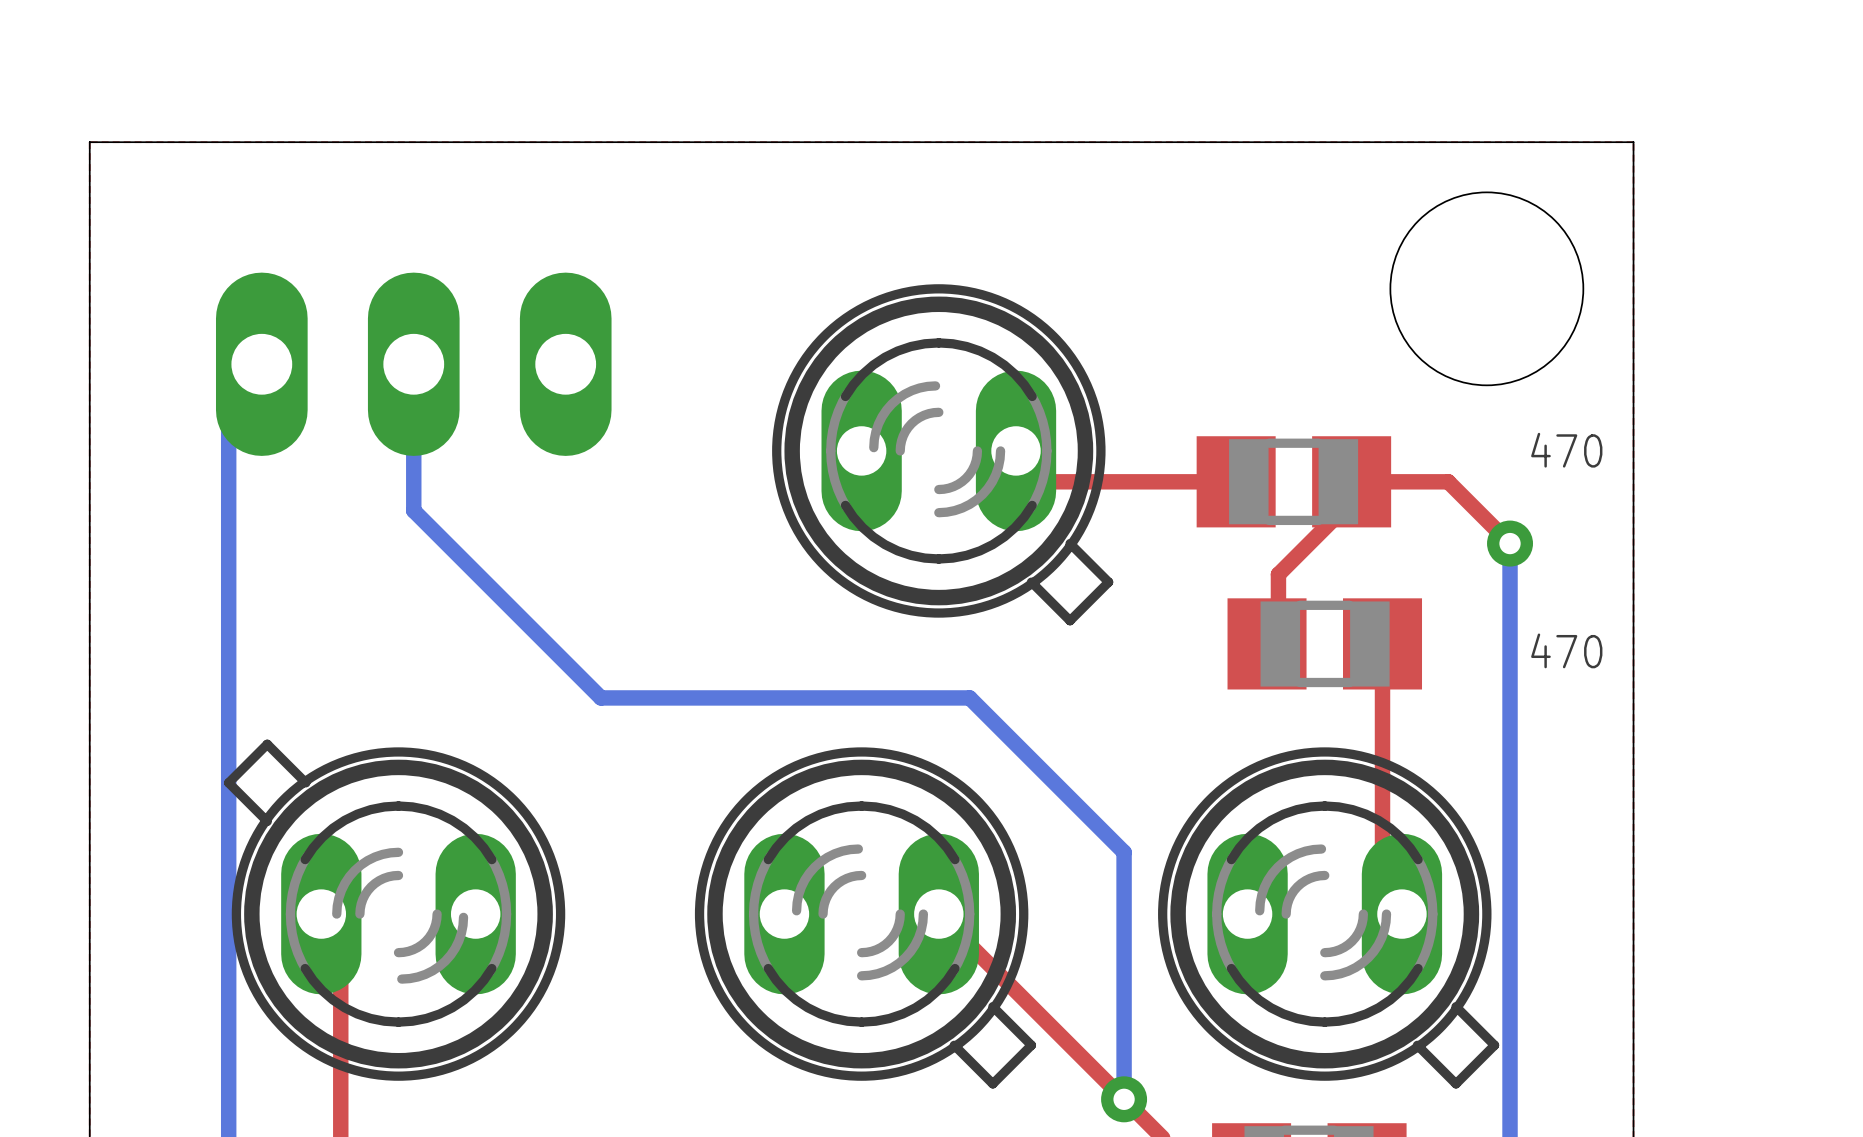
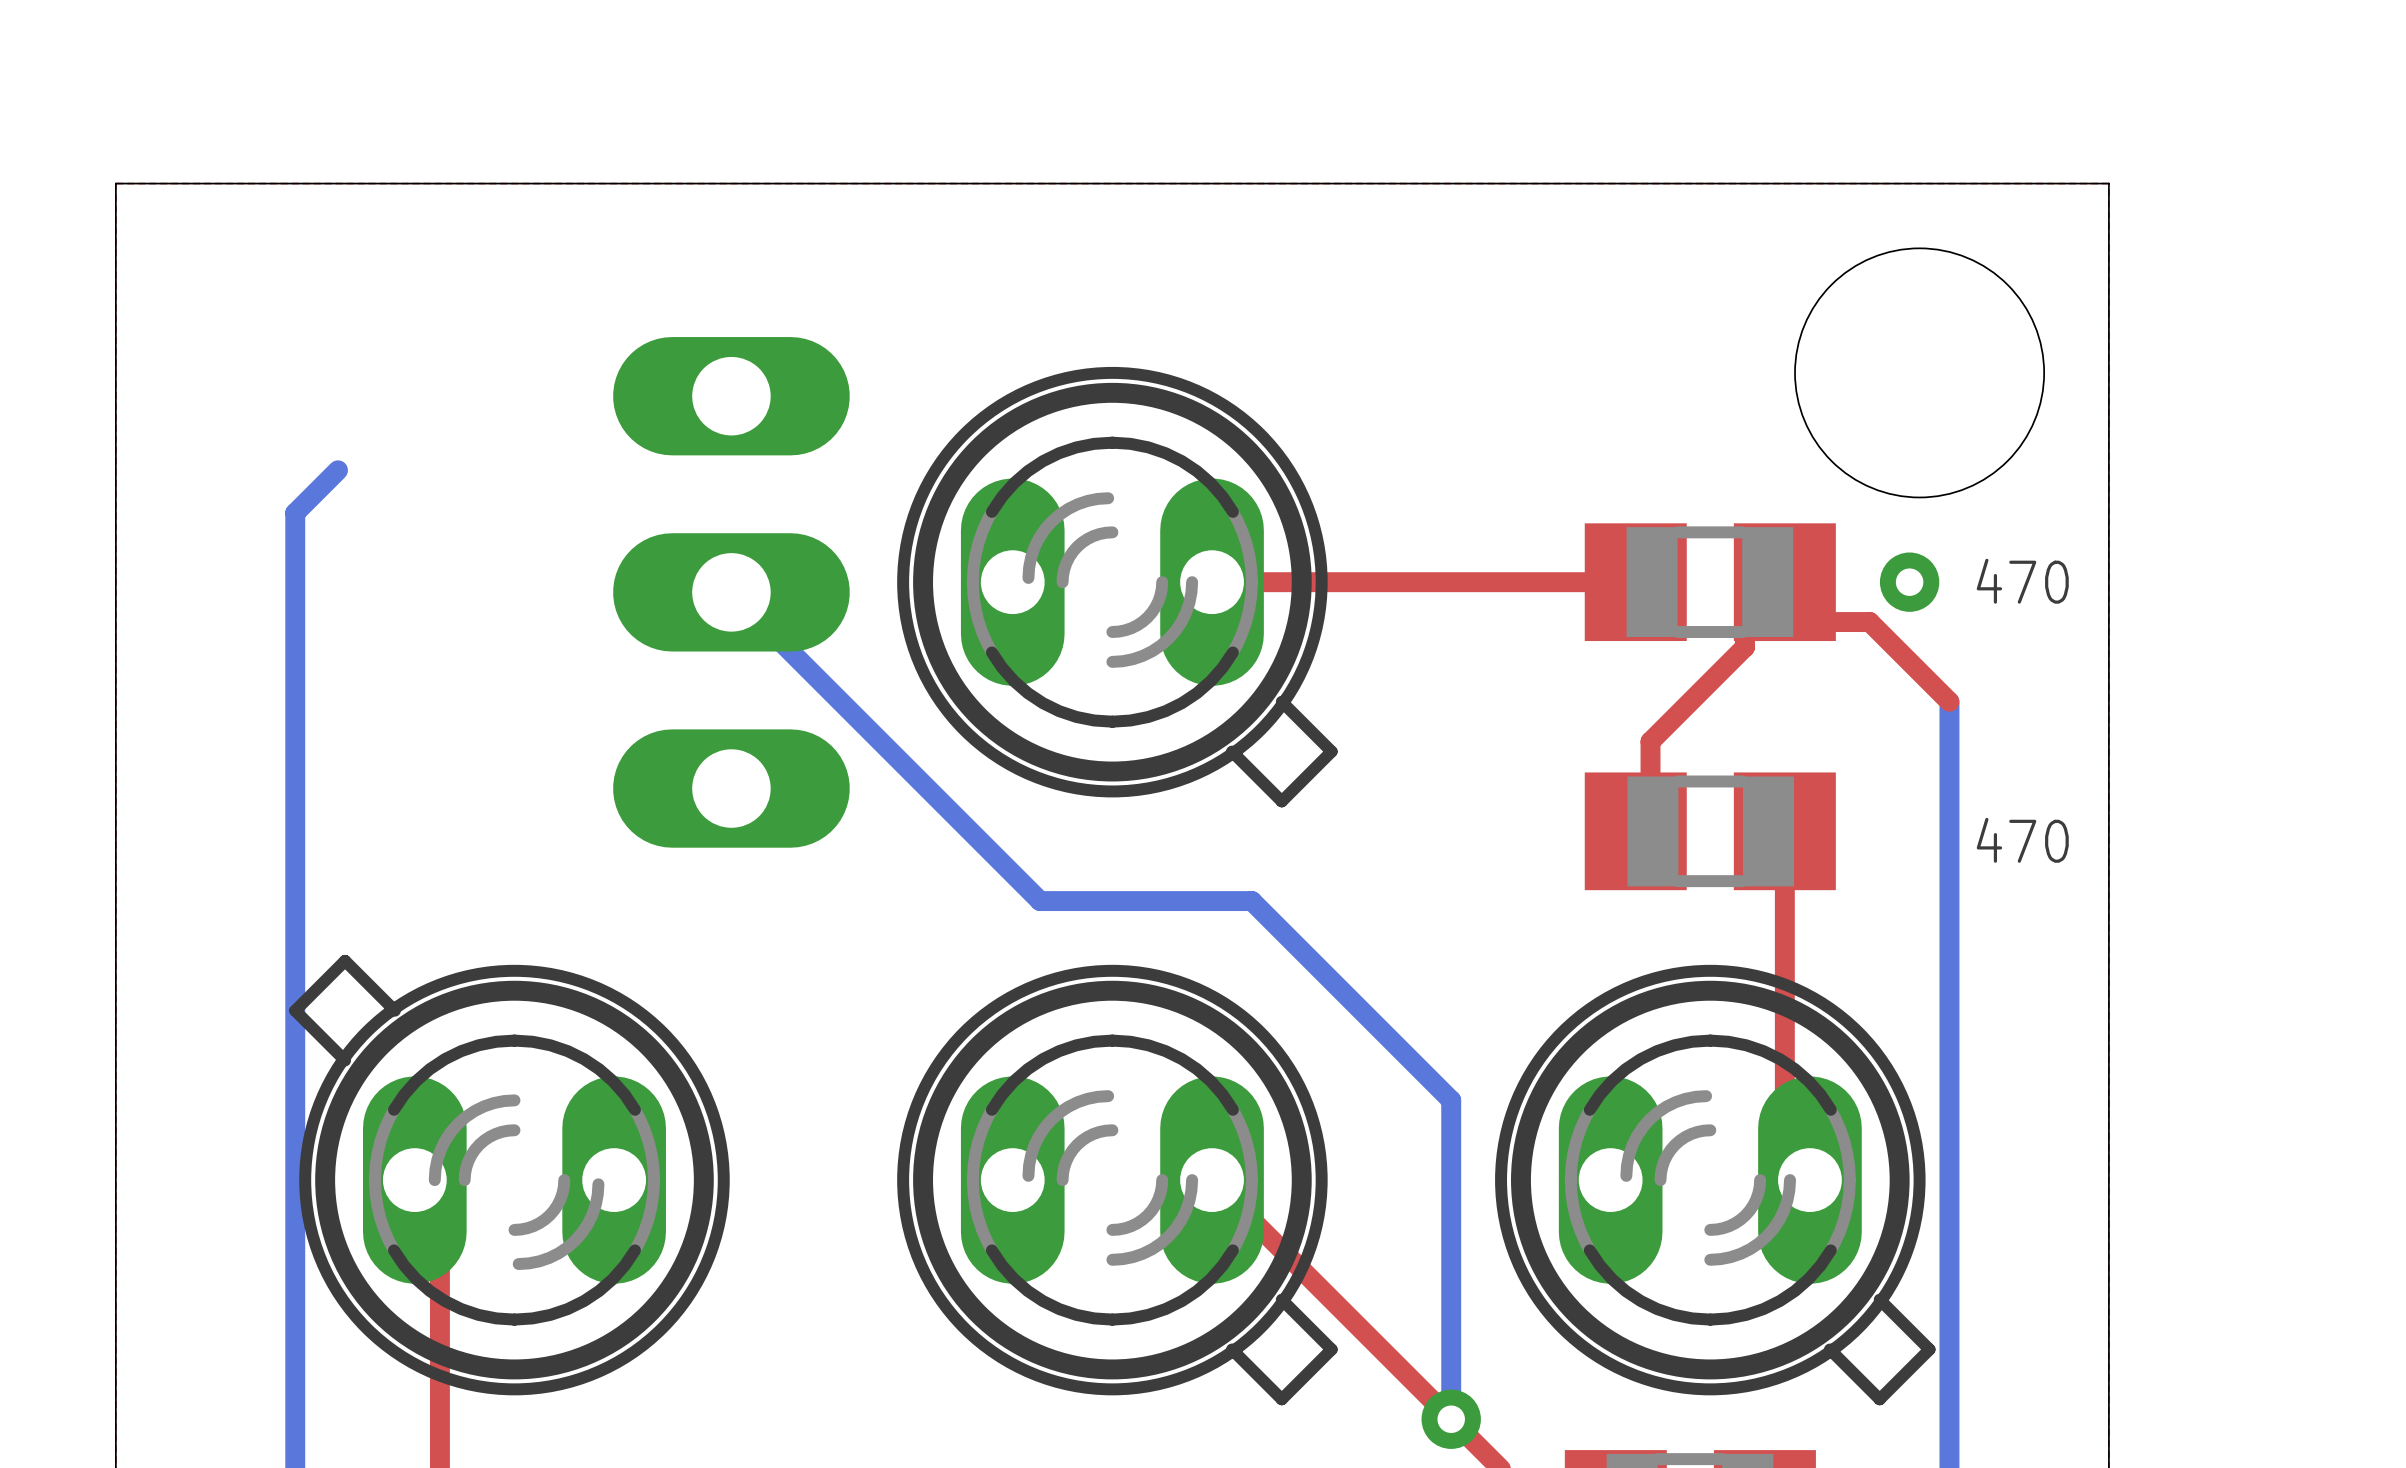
bottom track: (413, 364) (413, 510) (601, 697) (805, 697) -> (731, 592) (1040, 901)
part rotation: 0° (413, 364) -> 90° clockwise (731, 592)
top track: none -> (1212, 582) (1635, 582)
top track: (1016, 450) (1046, 481) (1236, 481) -> none
part position: (942, 454) -> (1117, 587)
part position: (1293, 481) -> (1710, 582)
via position: (1510, 543) -> (1909, 582)

